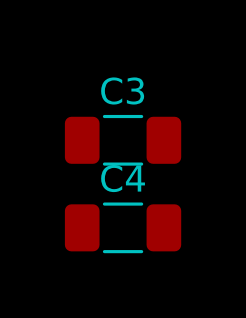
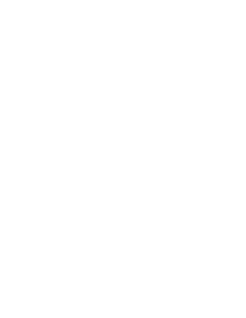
C3: (123, 140) -> none
C4: (123, 227) -> none

